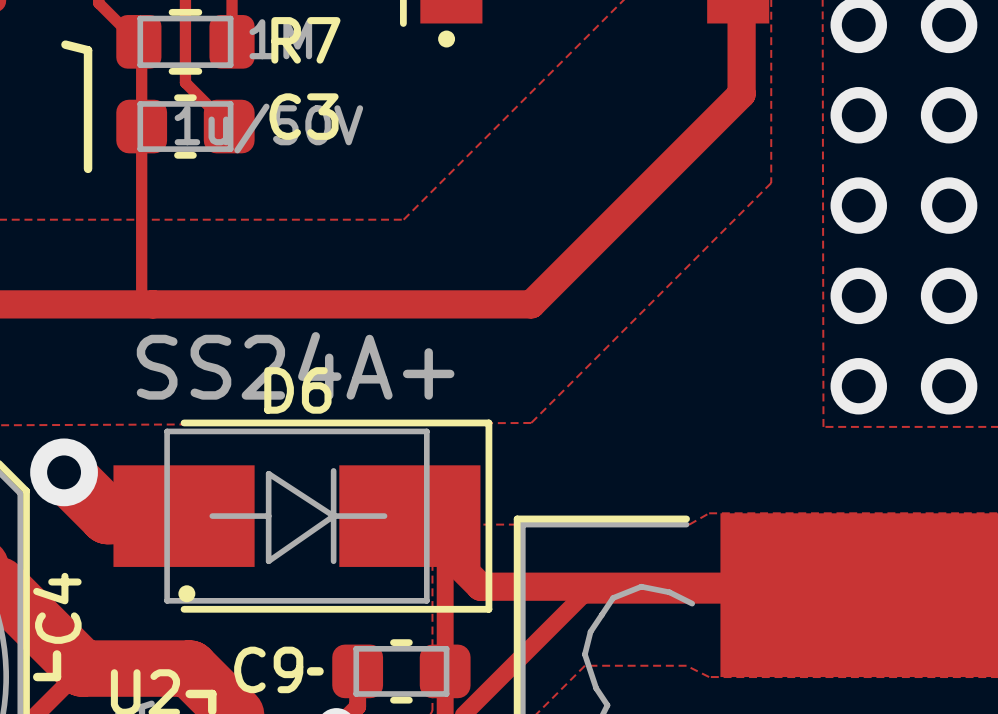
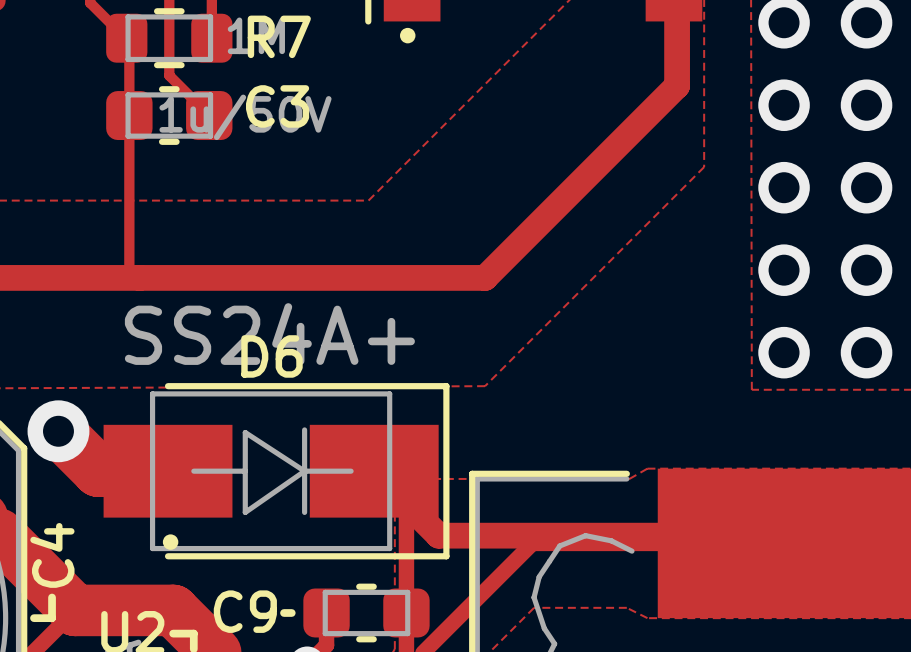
line: (65, 44) (88, 50) (88, 168) -> none

